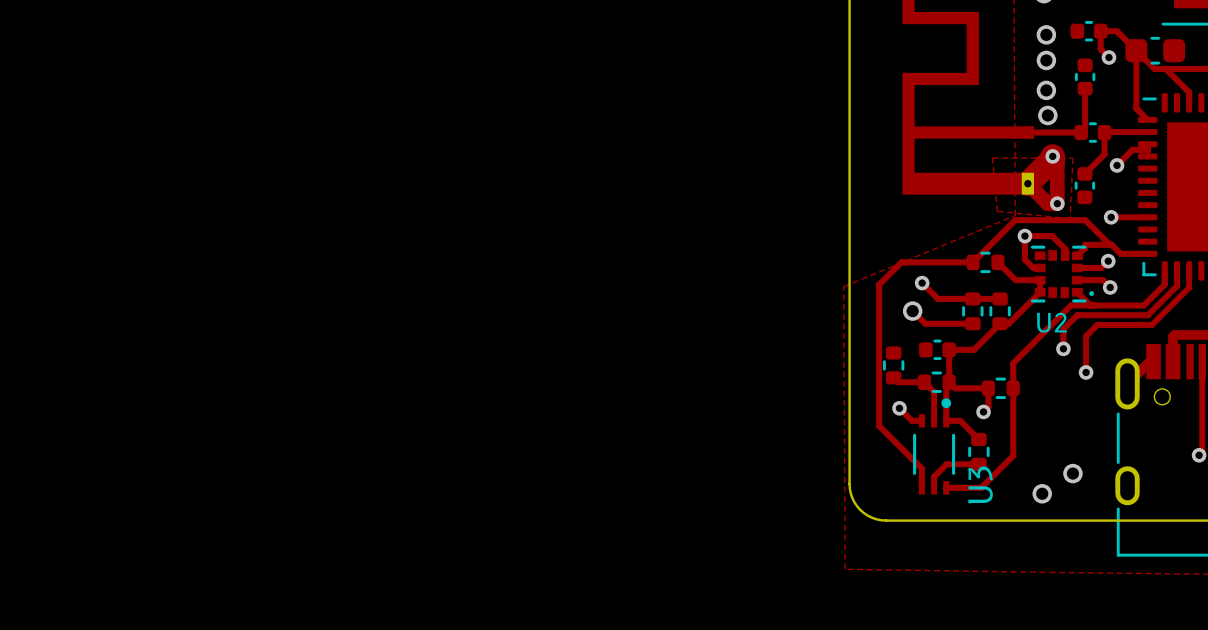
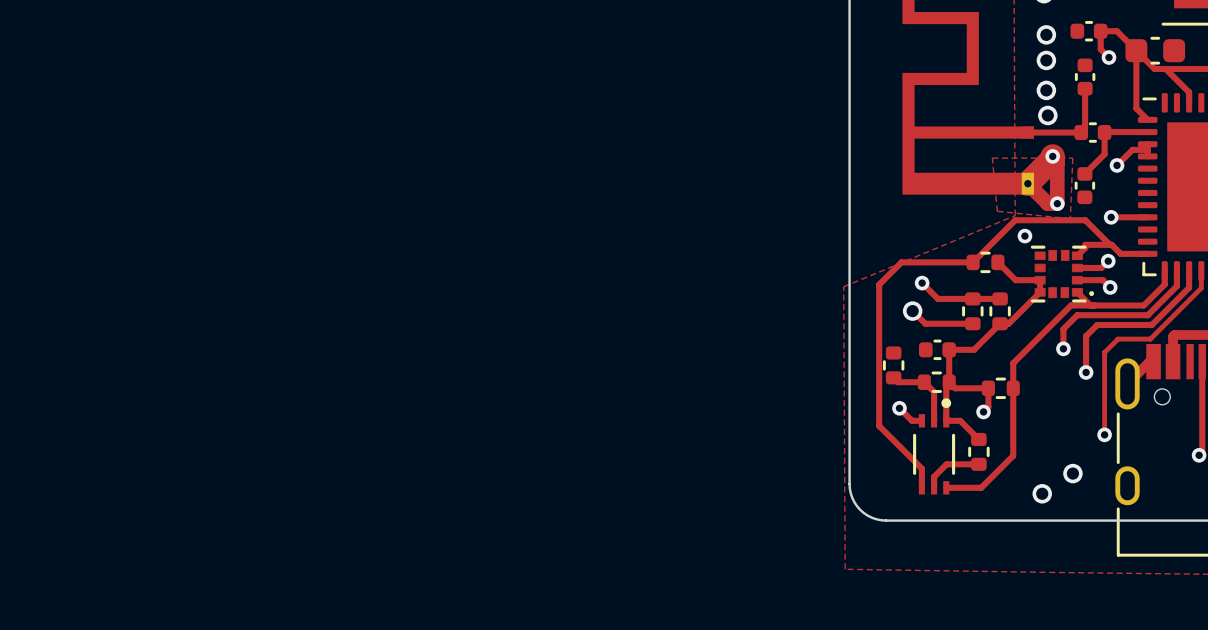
track: (1065, 255) (1065, 249) (1052, 236) (1024, 236) (1024, 259) (1033, 267) (1040, 267) -> none
track: none -> (1201, 270) (1201, 288) (1150, 339) (1118, 339) (1104, 352) (1104, 434)
U2 name: U2 (1051, 322) -> none
via: none -> (1104, 434)
U3 name: U3 (980, 484) -> none

